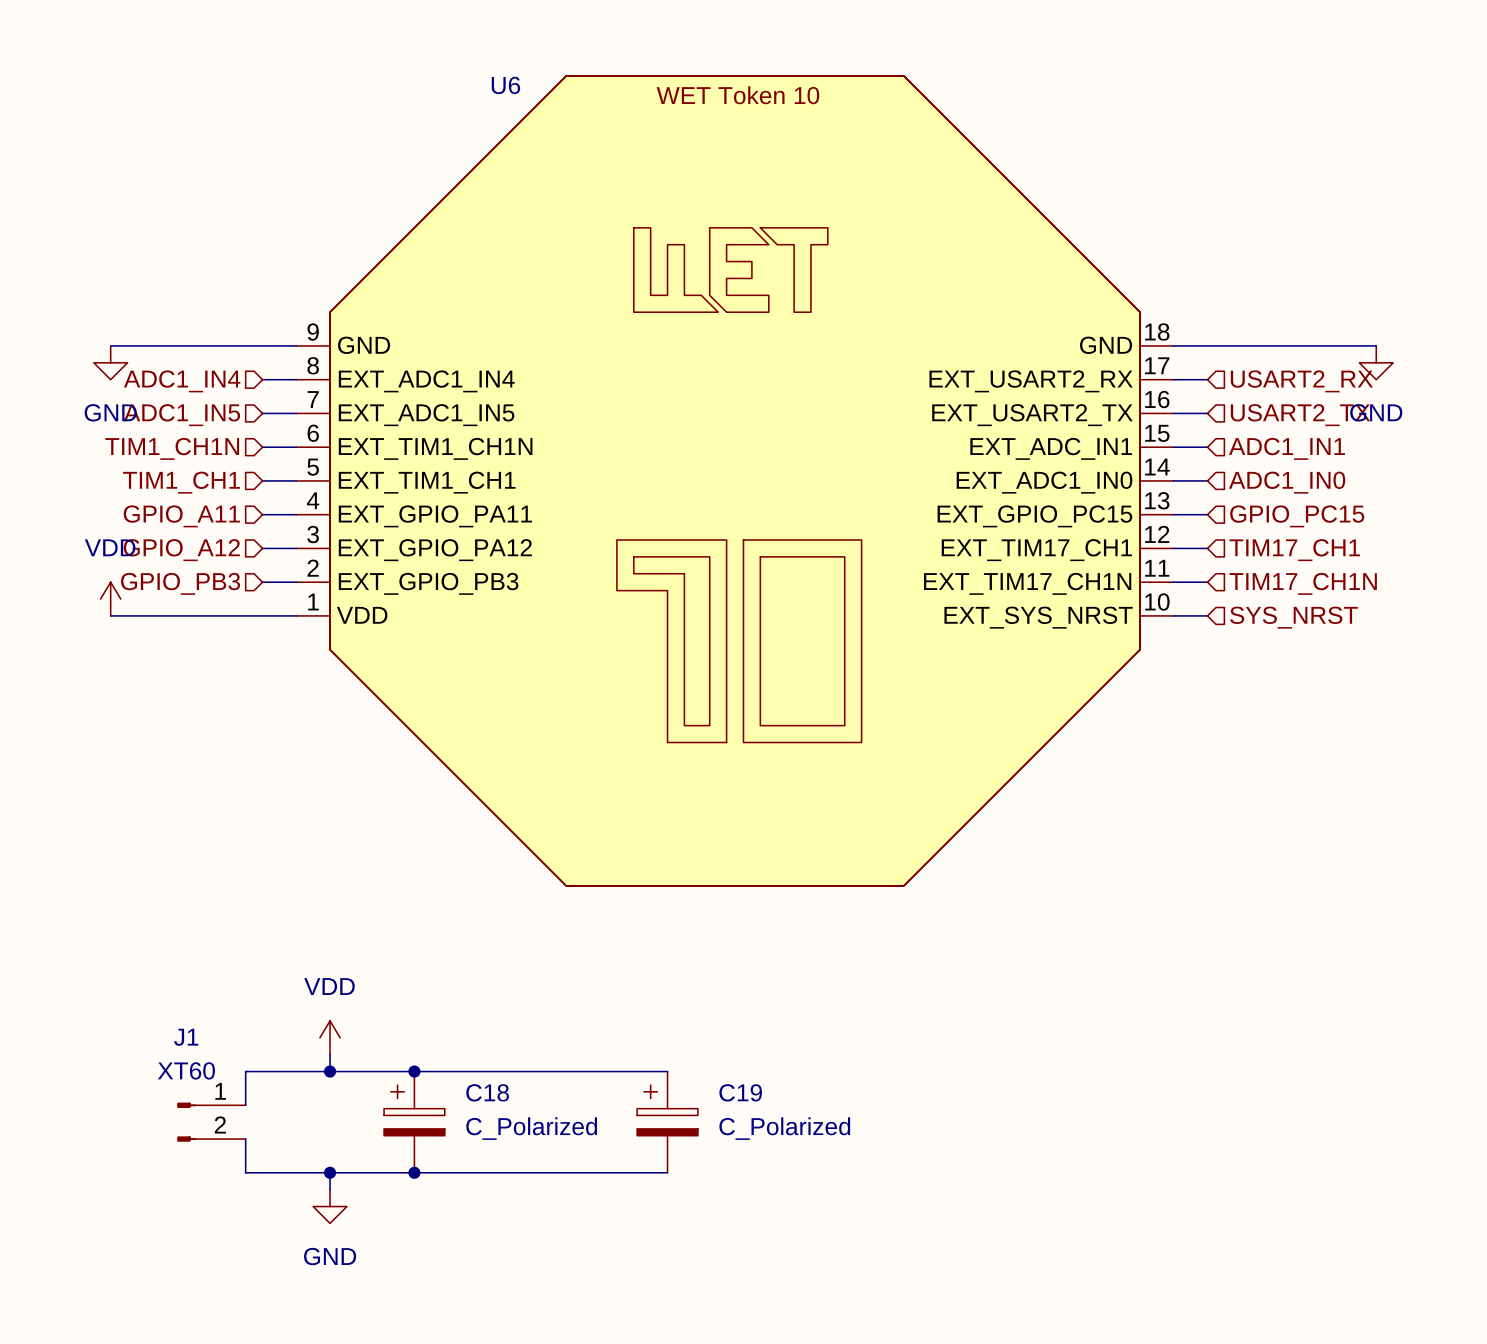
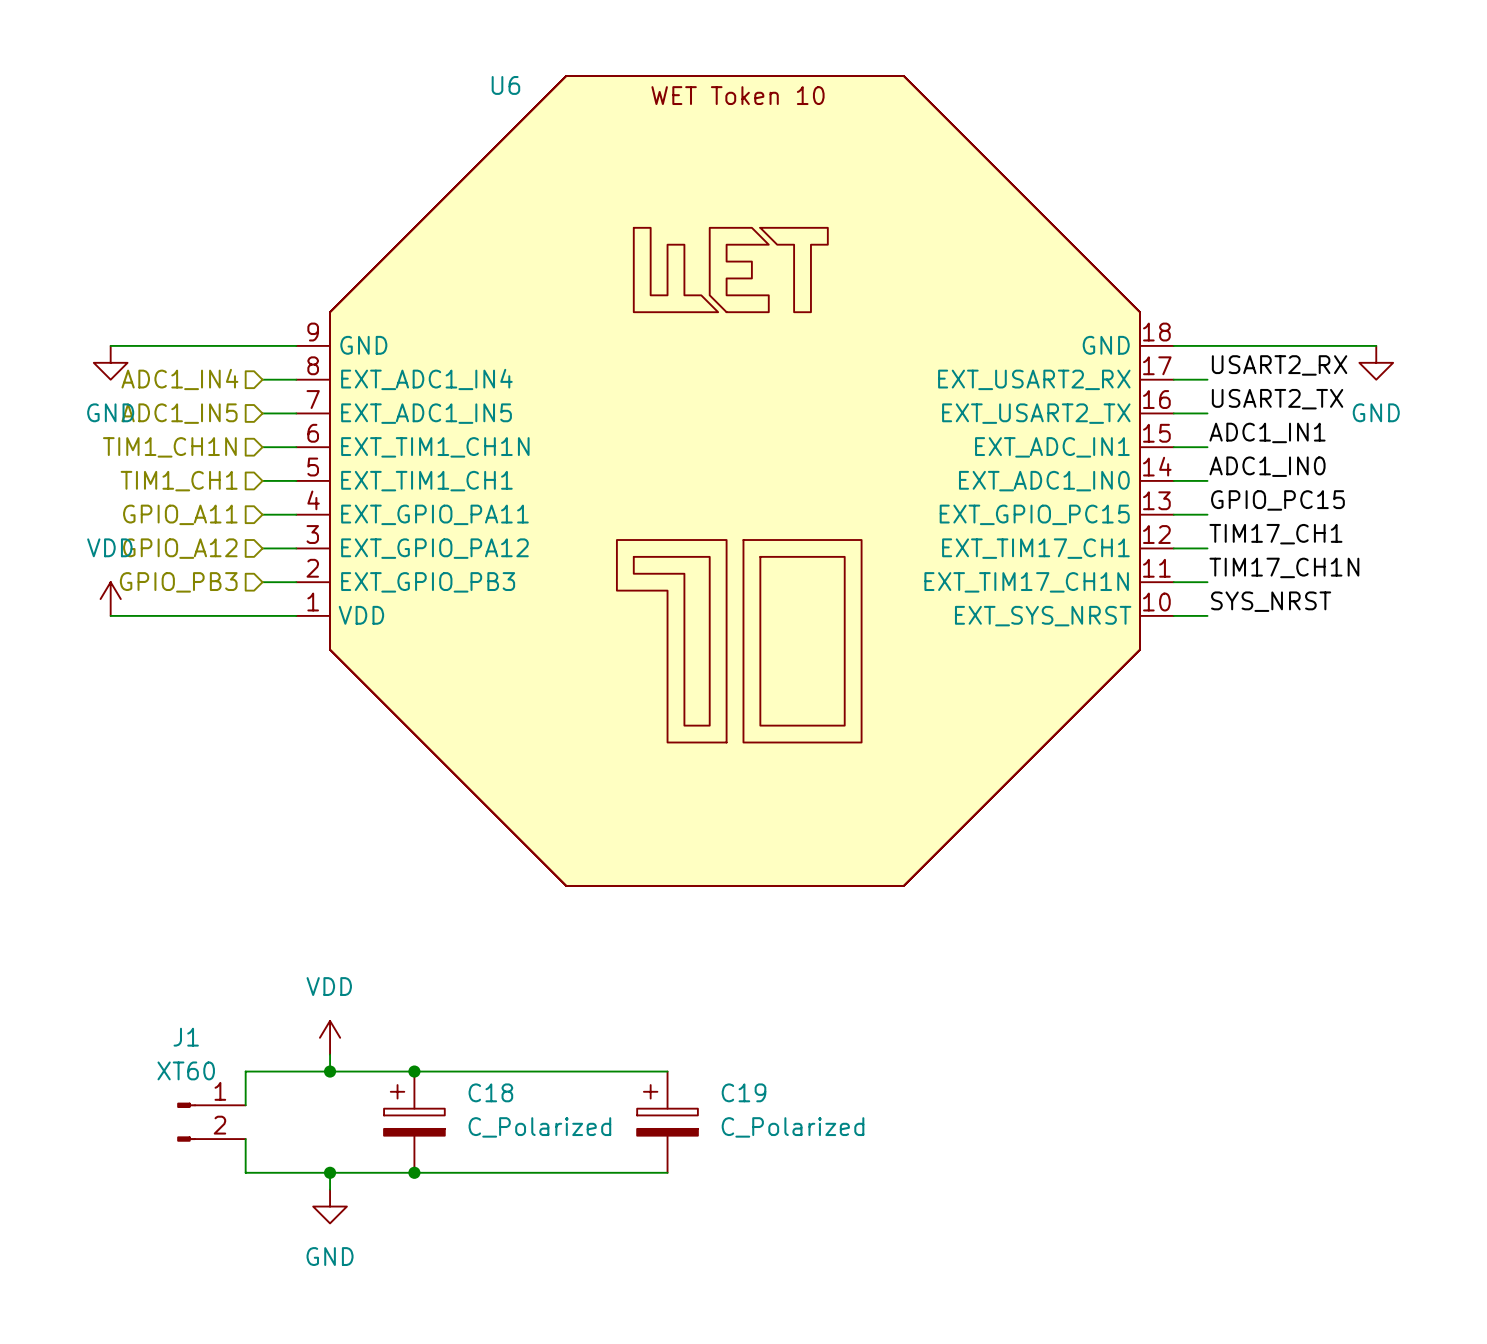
label: none -> USART2_RX (1279, 365)
hierarchical label: USART2_RX (1301, 381) -> none
label: none -> USART2_TX (1277, 399)
hierarchical label: USART2_TX (1300, 415) -> none
label: none -> ADC1_IN1 (1267, 432)
hierarchical label: ADC1_IN1 (1286, 448) -> none
label: none -> ADC1_IN0 (1267, 466)
hierarchical label: ADC1_IN0 (1287, 482) -> none
label: none -> GPIO_PC15 (1277, 500)
hierarchical label: GPIO_PC15 (1297, 516) -> none
label: none -> TIM17_CH1 (1275, 534)
hierarchical label: TIM17_CH1 (1294, 550) -> none
label: none -> TIM17_CH1N (1284, 567)
hierarchical label: TIM17_CH1N (1303, 583) -> none
label: none -> SYS_NRST (1271, 601)
hierarchical label: SYS_NRST (1293, 617) -> none

